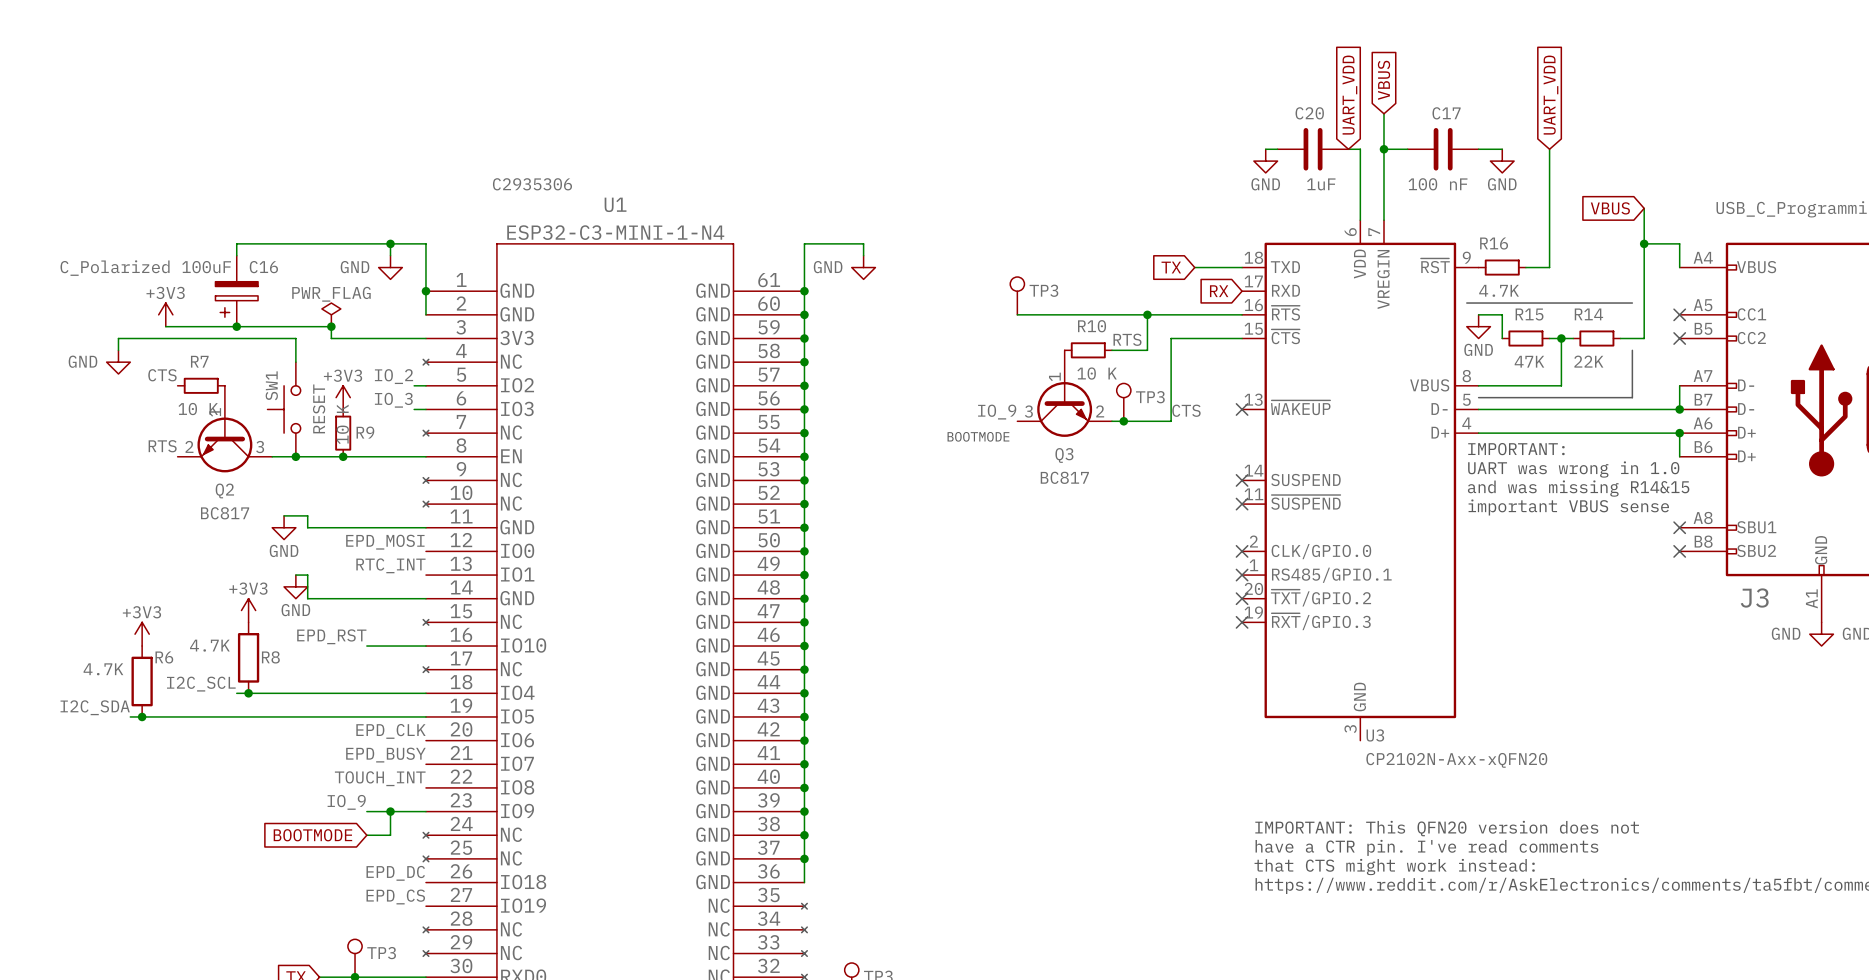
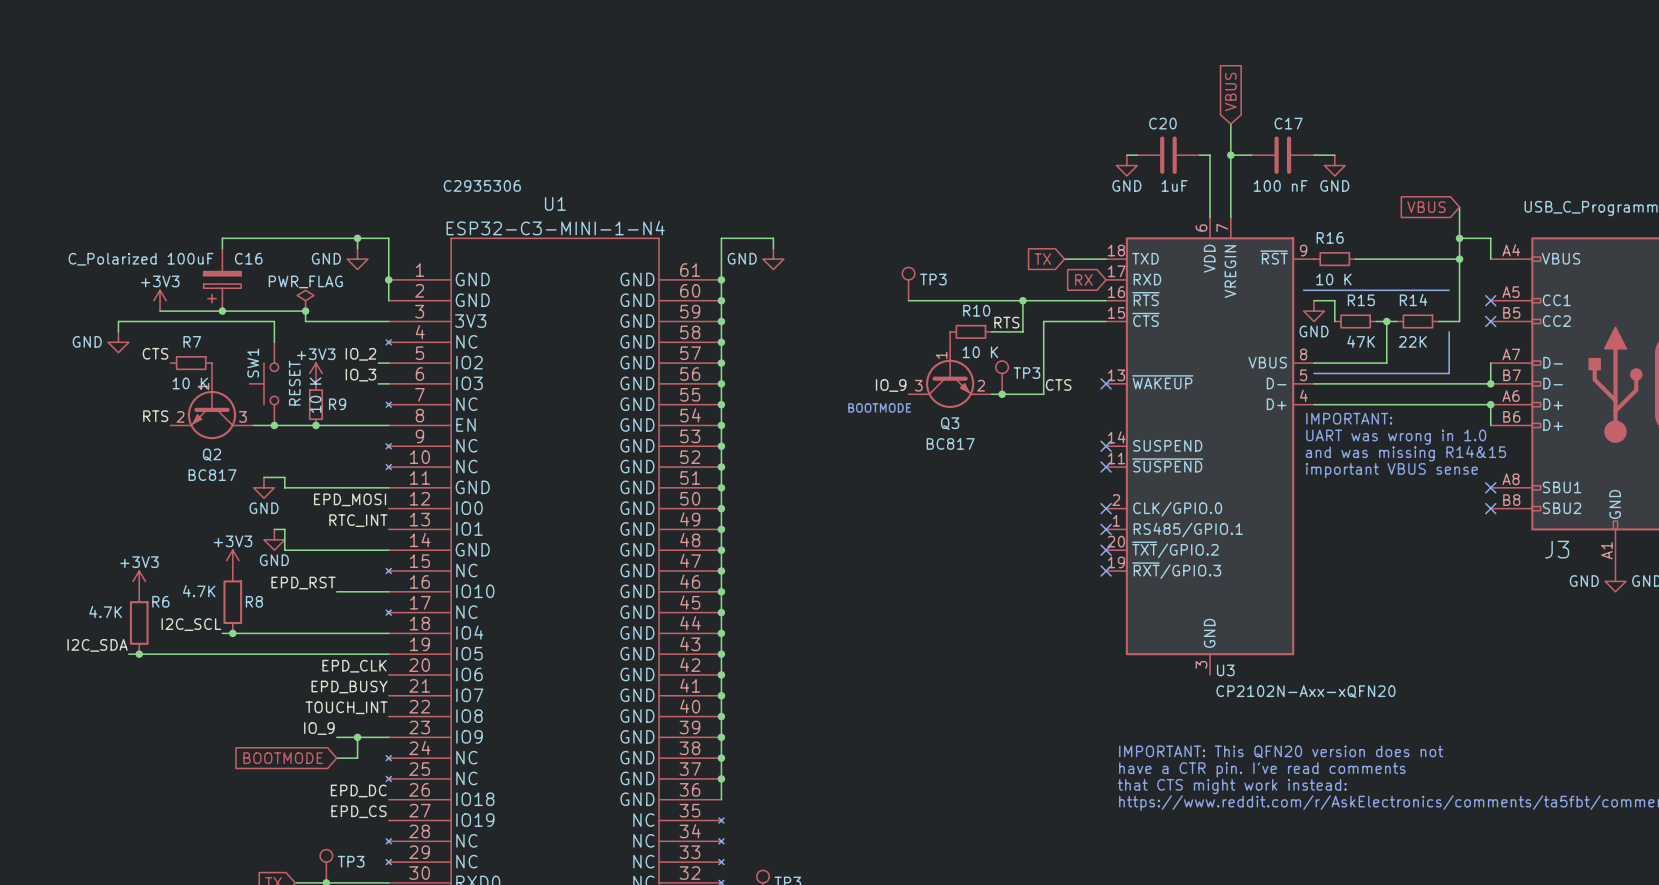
global label: UART_VDD (1349, 95) -> none
global label: UART_VDD (1551, 95) -> none
wire: (1549, 149) (1549, 267) -> (1459, 259) (1376, 259)
junction: none -> (1459, 259)
R16 value: 4.7K (1499, 290) -> 10 K (1333, 279)

